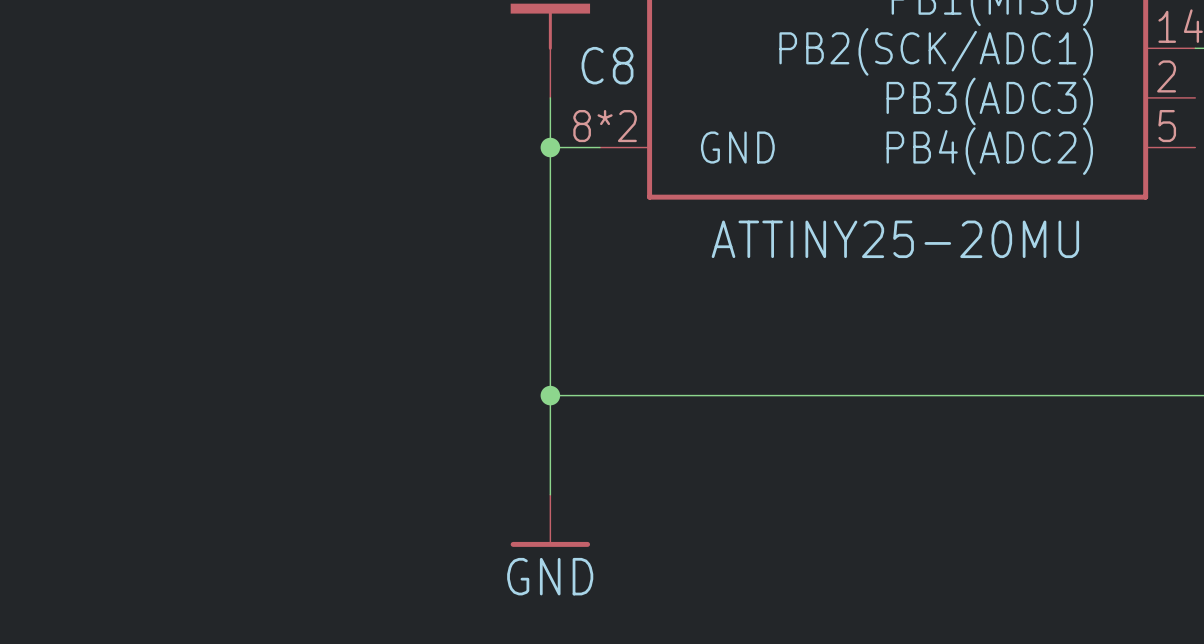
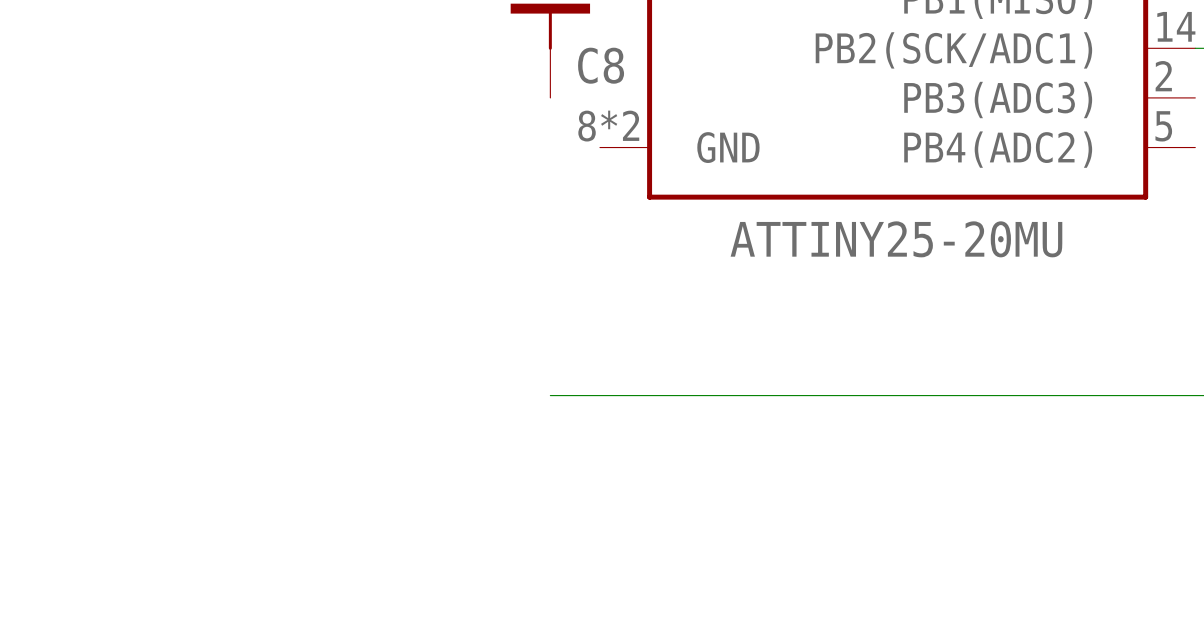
wire: (550, 97) (550, 494) -> none
wire: (550, 147) (599, 147) -> none
junction: (550, 147) -> none
junction: (550, 395) -> none
power symbol: GND (550, 520) -> none

